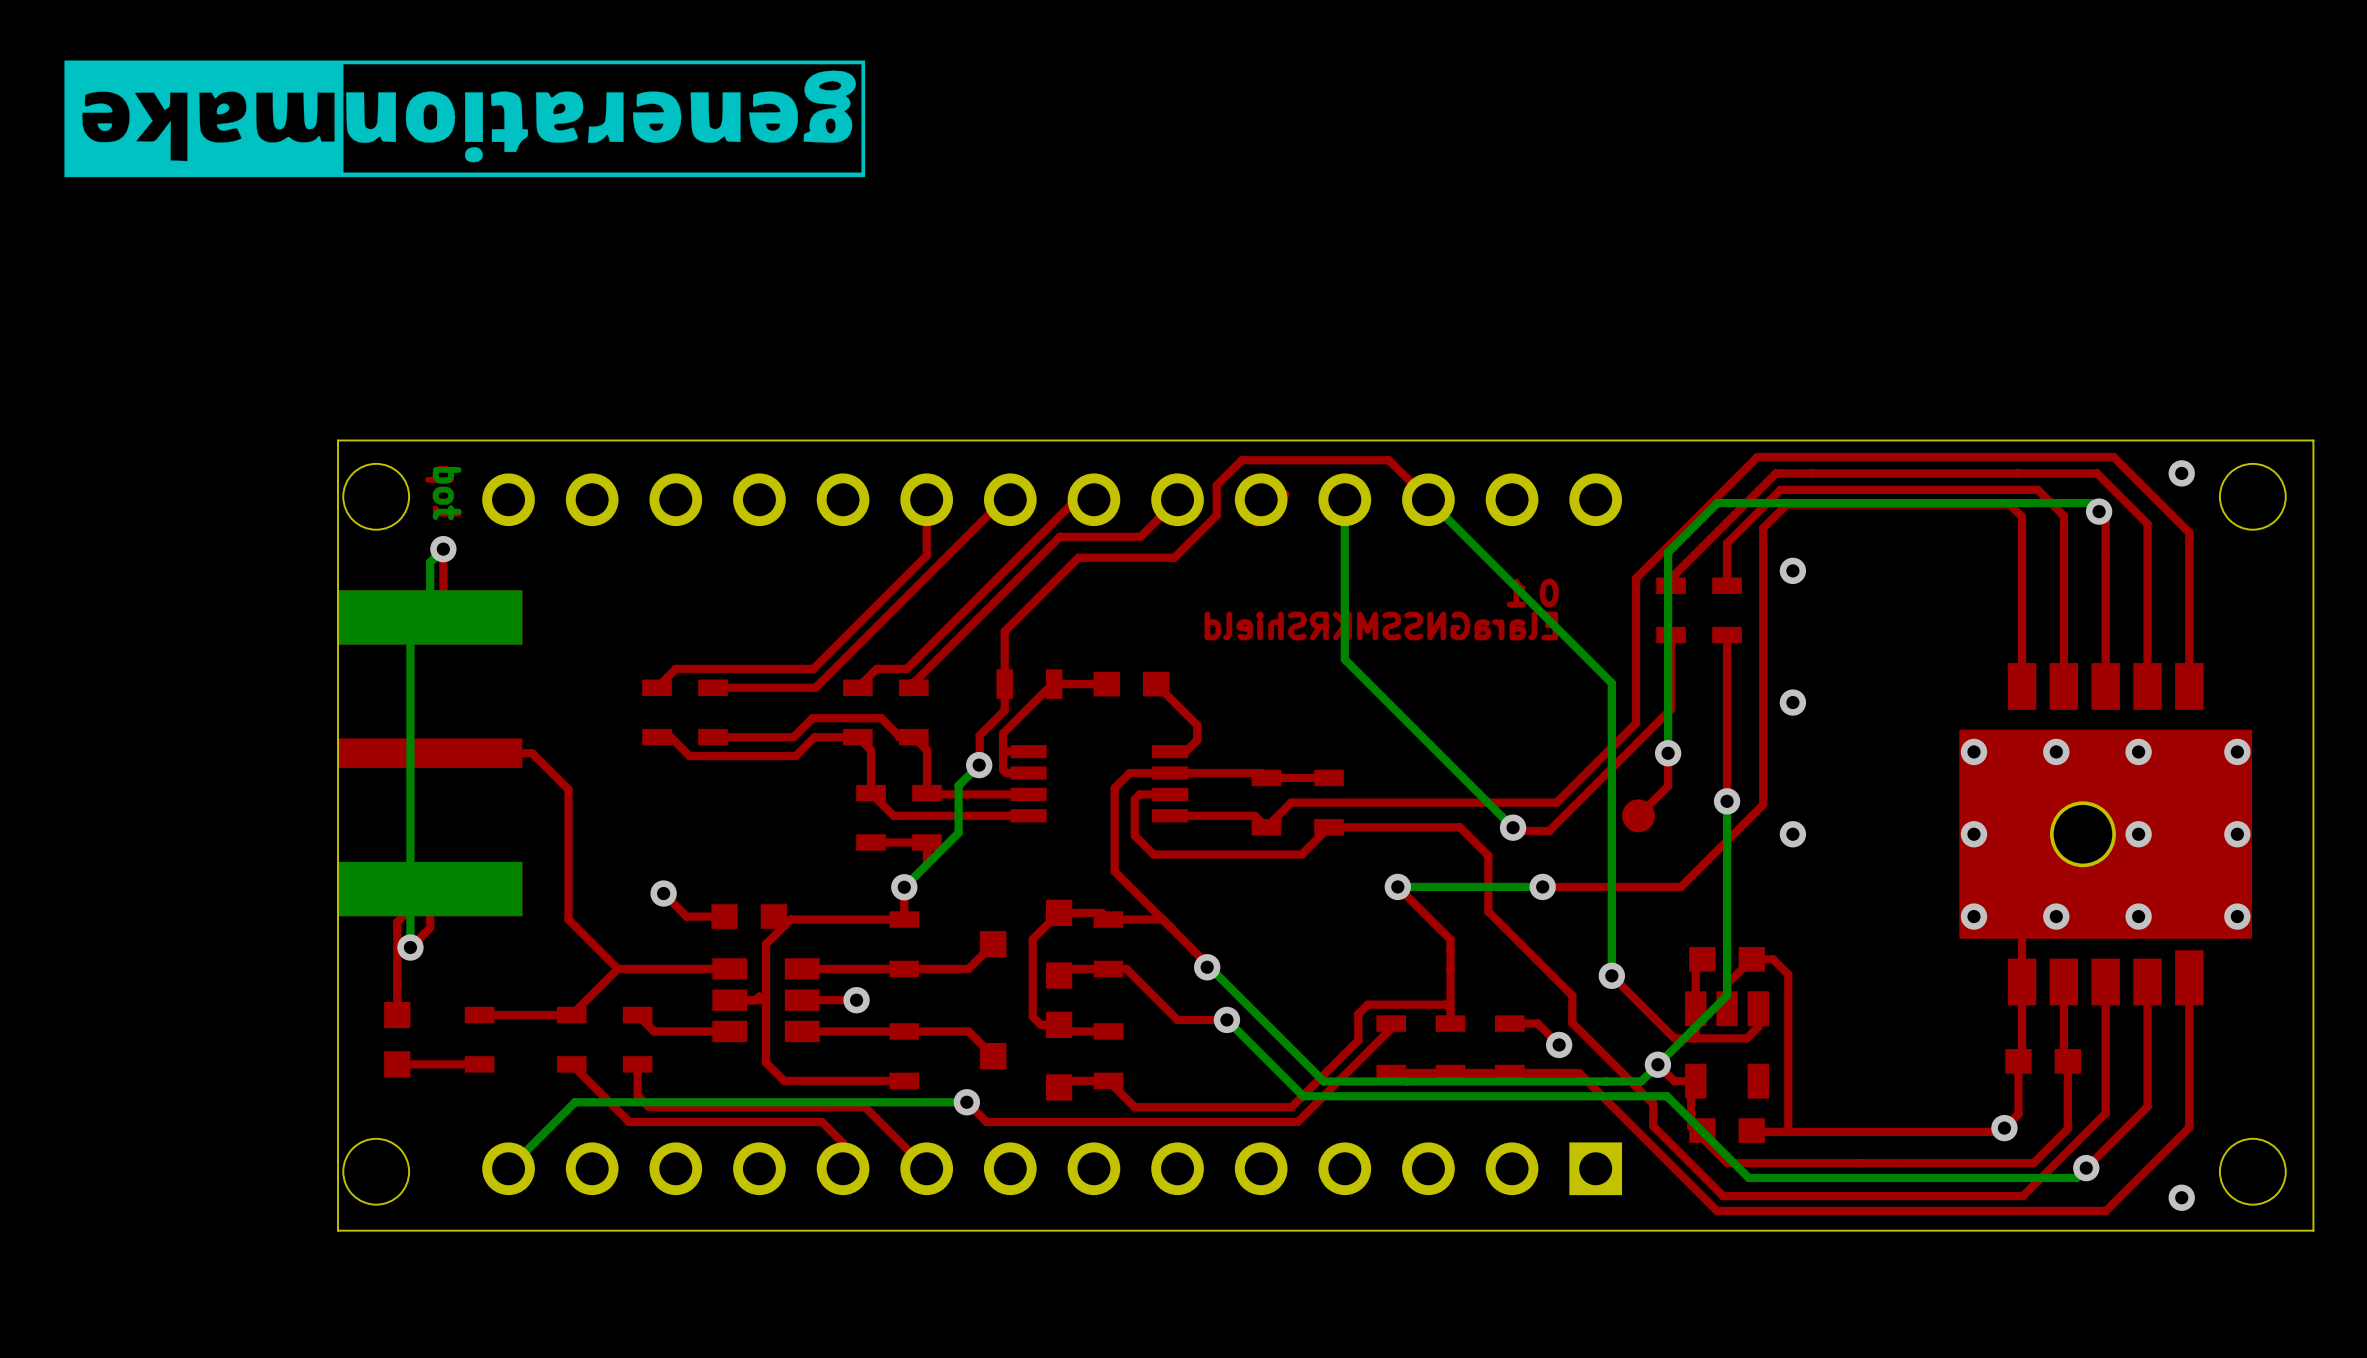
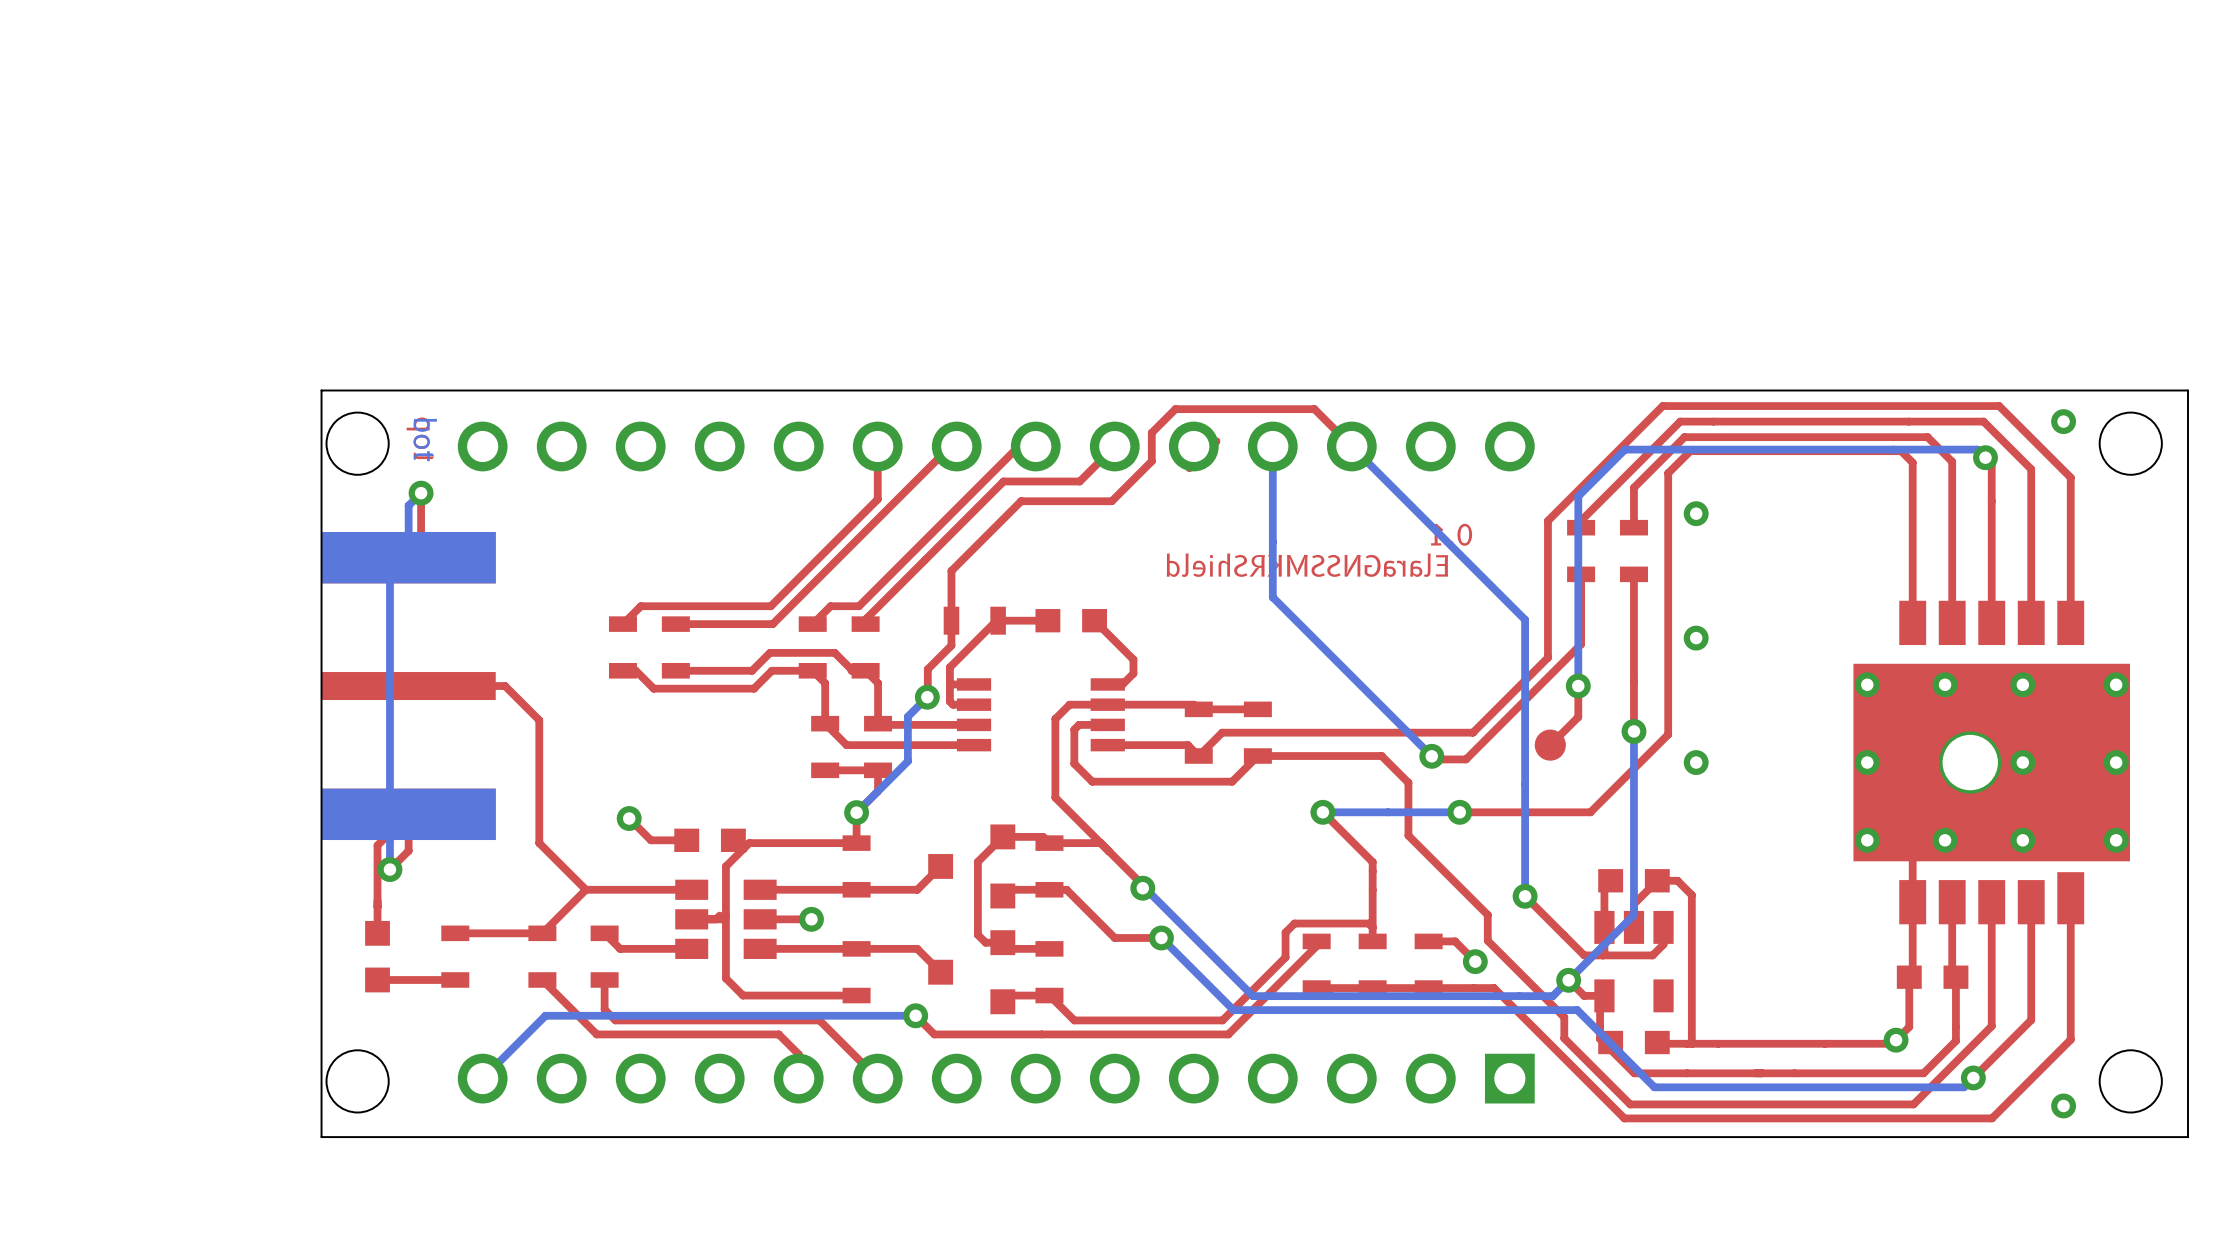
drawing: [64, 60, 866, 178] -> none

